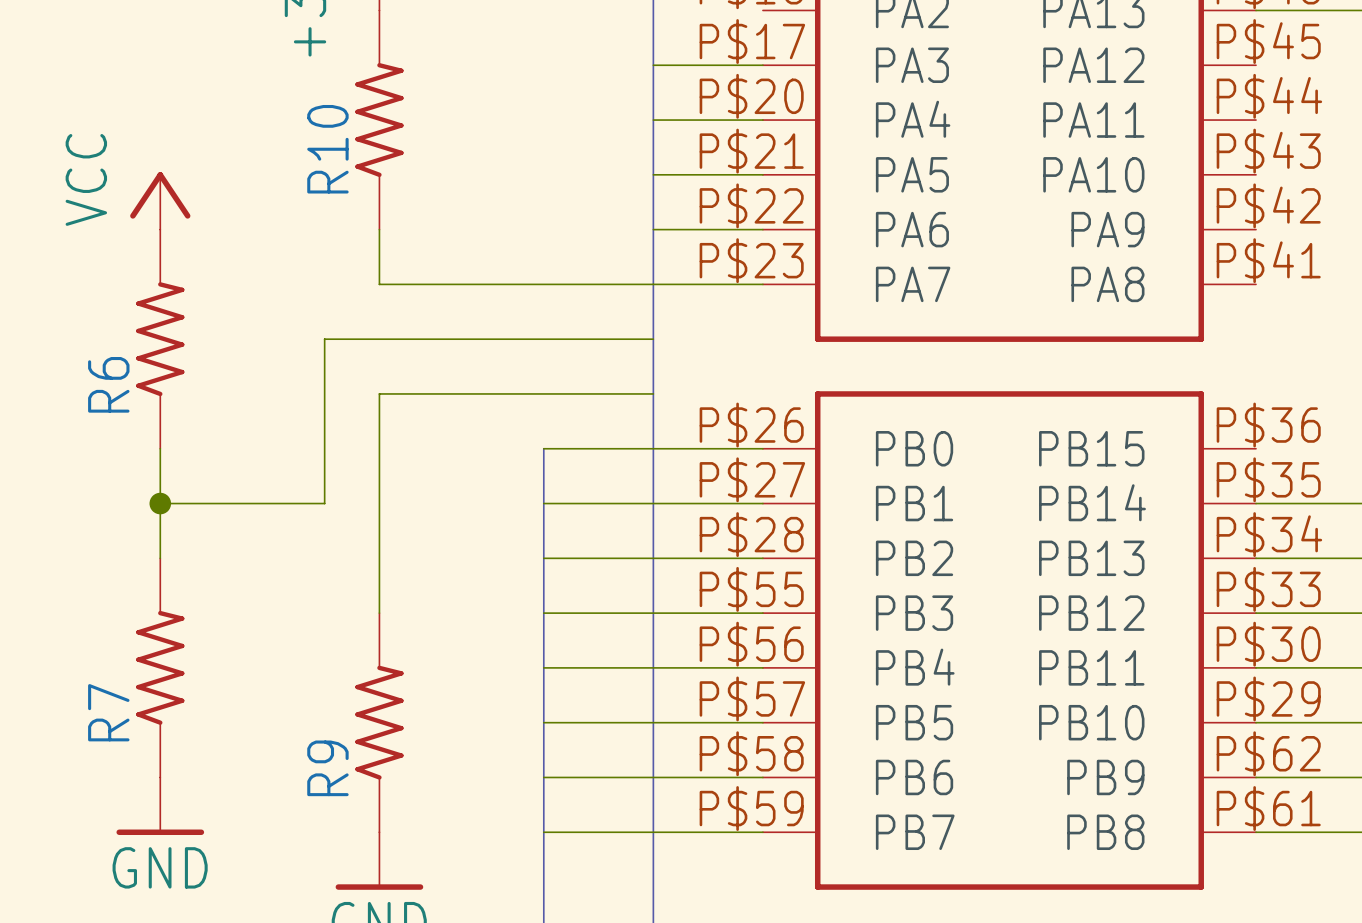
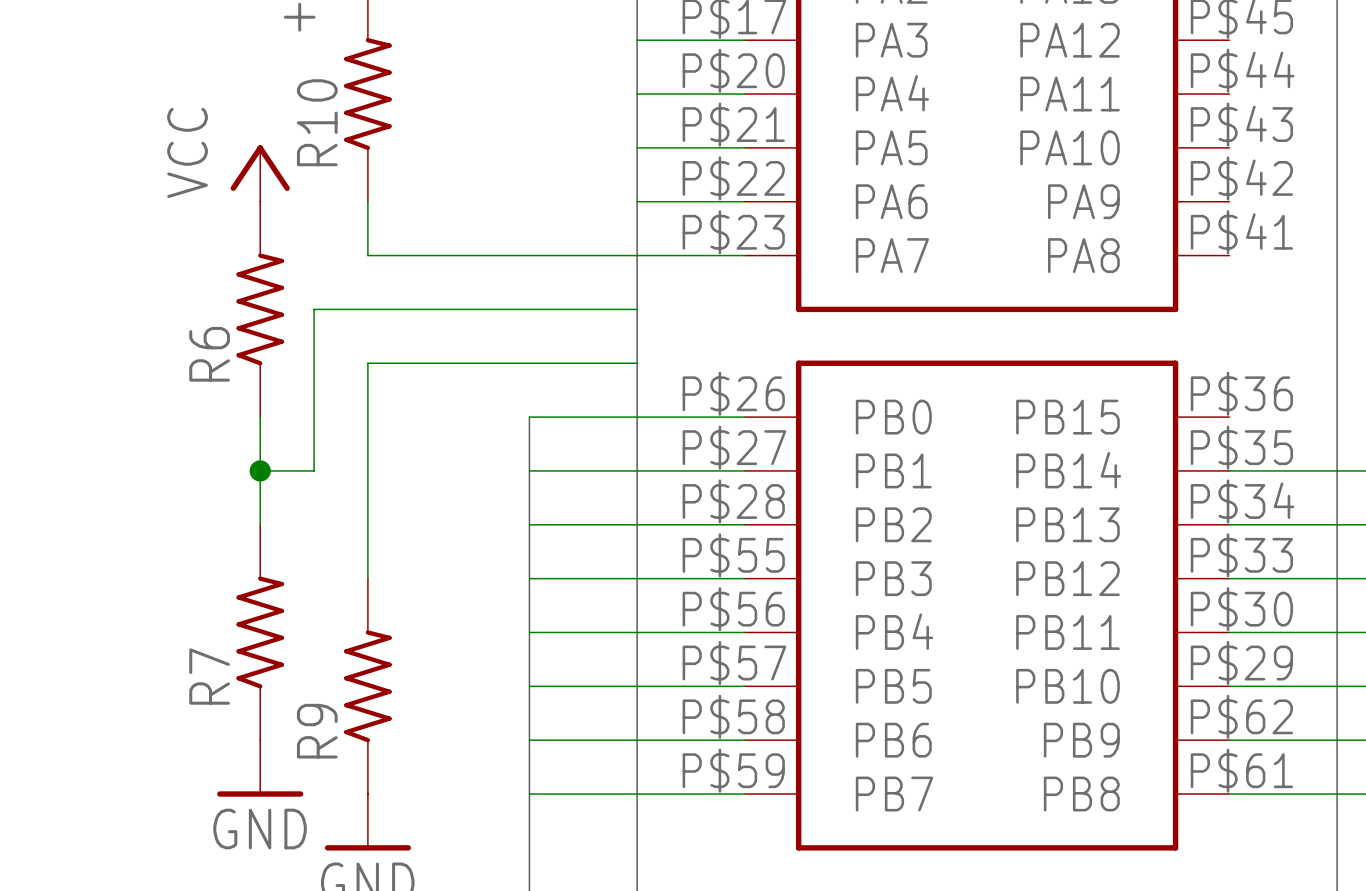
power symbol position: VCC (160, 200) -> VCC (260, 173)
R6 position: (160, 339) -> (260, 309)
wire: (160, 448) (160, 558) -> (260, 417) (260, 524)
wire: (160, 503) (269, 503) -> none
junction position: (160, 503) -> (260, 470)
R7 position: (160, 667) -> (260, 632)
power symbol position: GND (160, 806) -> GND (260, 768)

